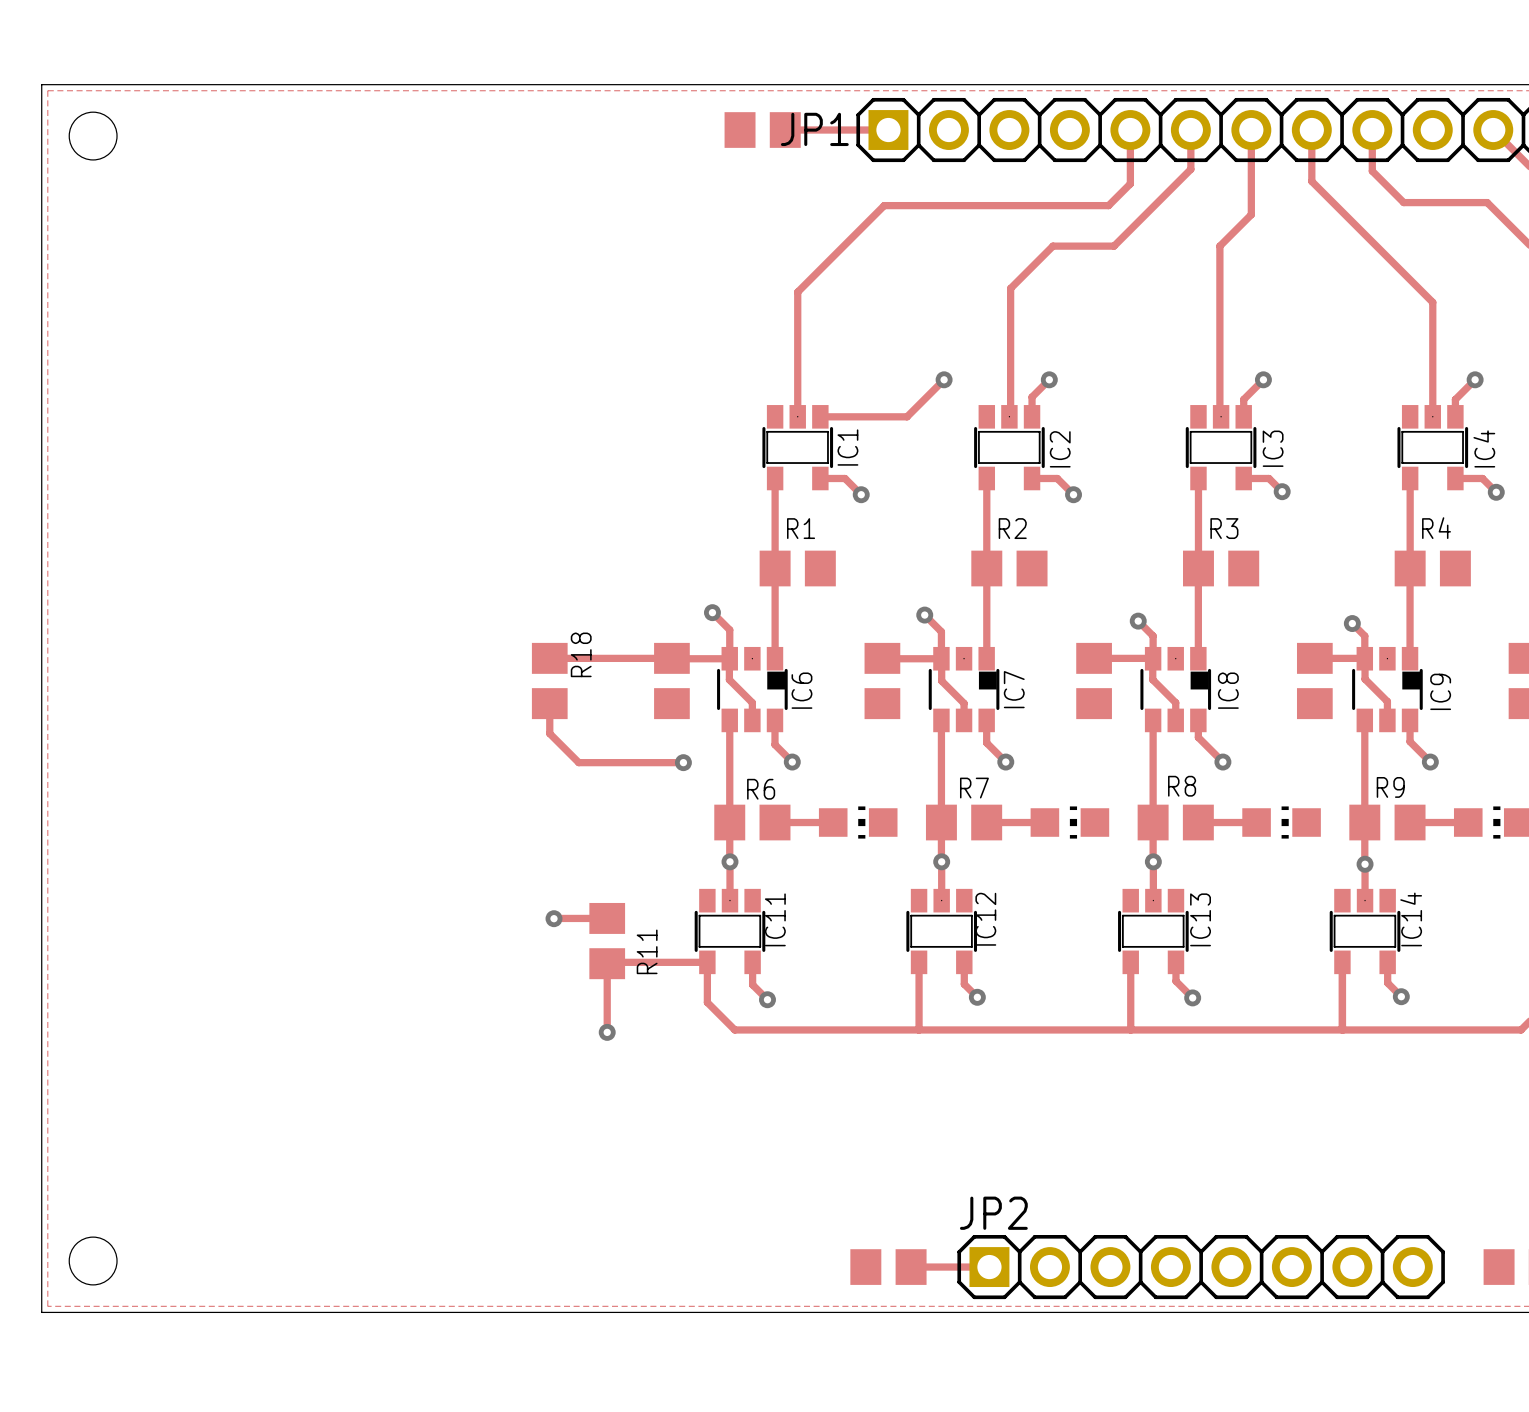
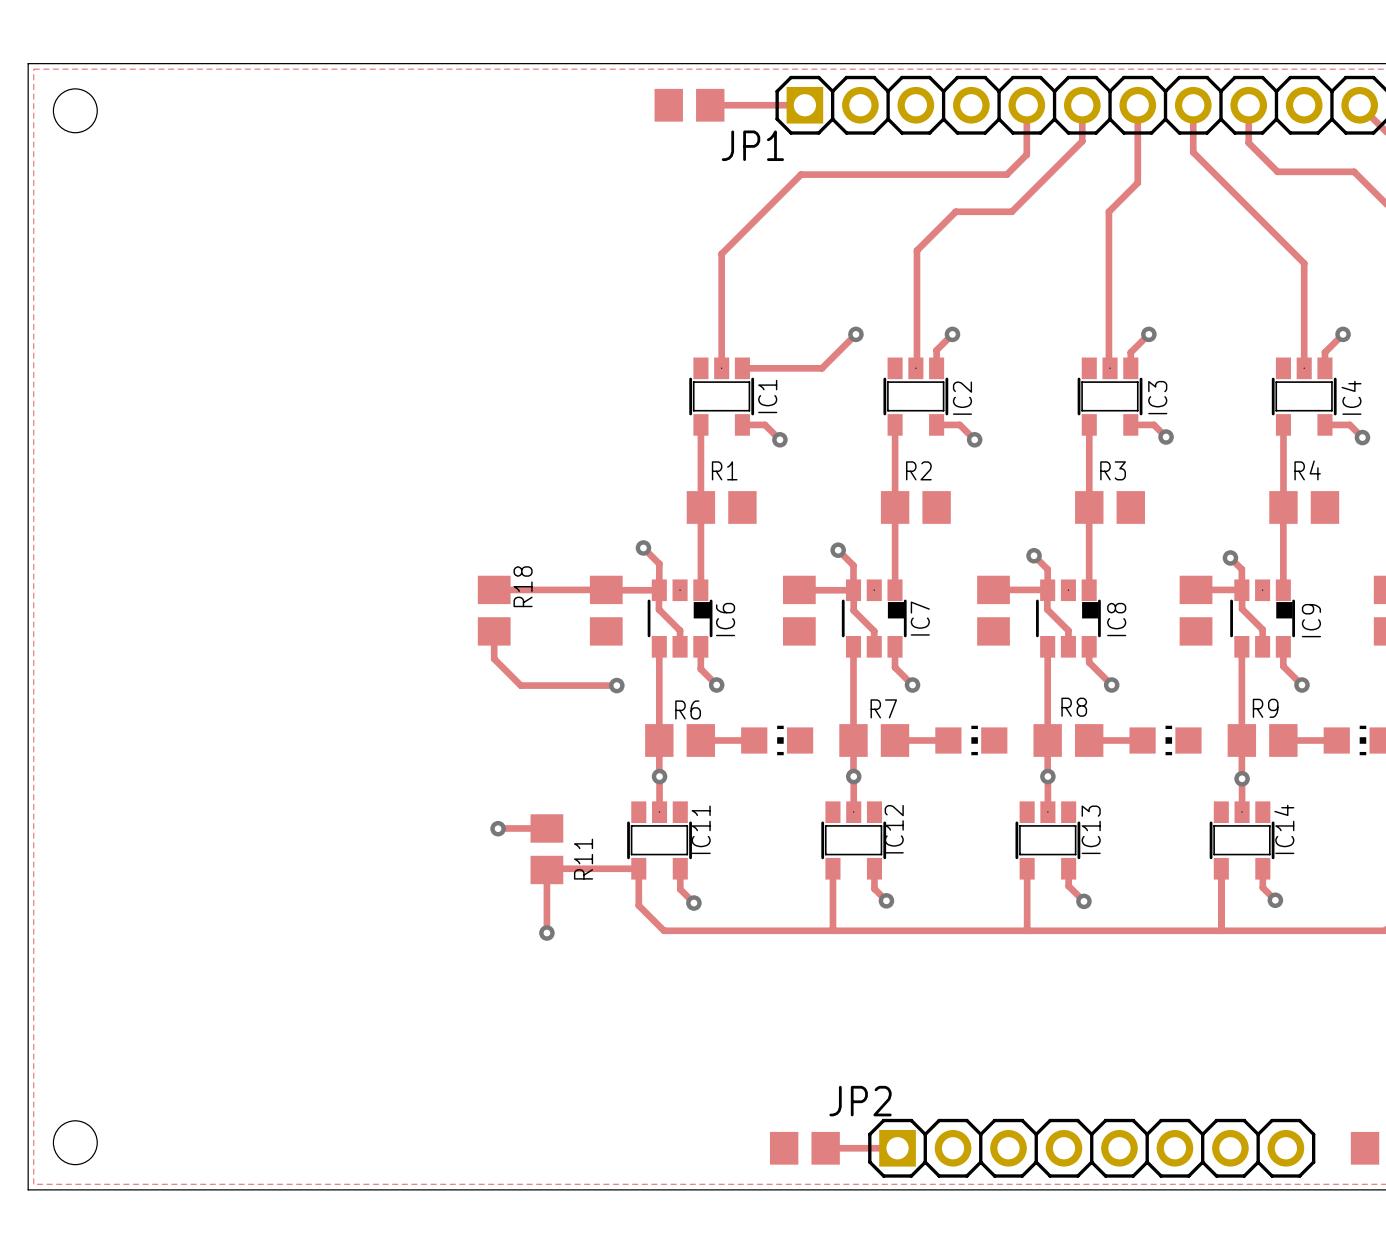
JP1 name position: JP1 (814, 129) -> JP1 (752, 145)
JP2 name position: JP2 (993, 1213) -> JP2 (860, 1101)

